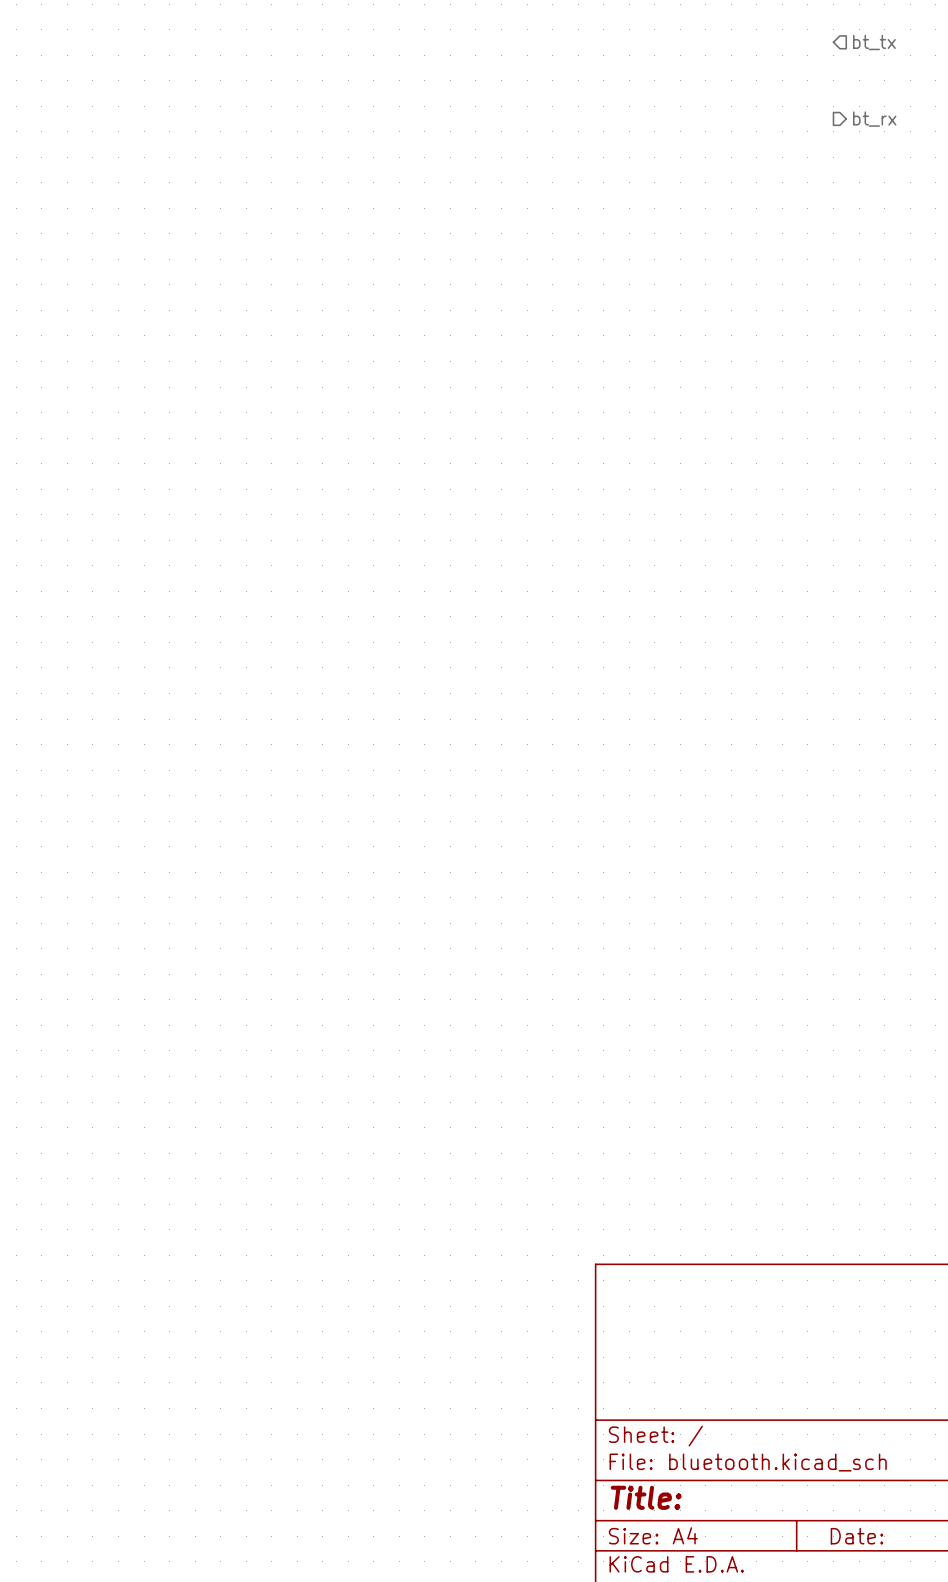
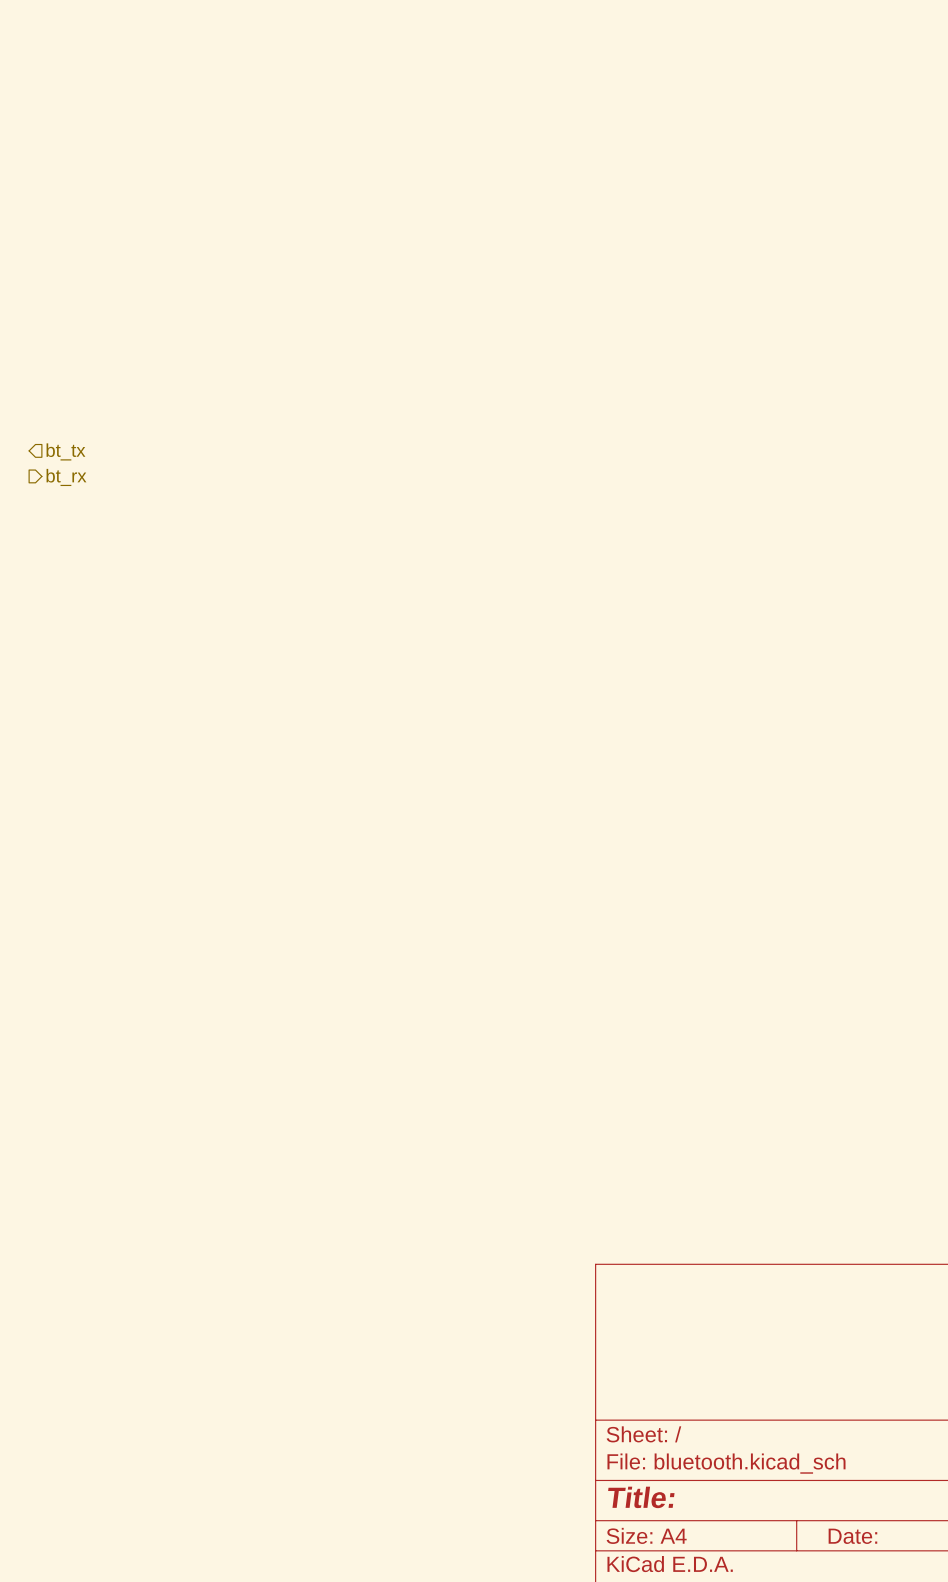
hierarchical label: bt_tx (874, 42) -> none
hierarchical label: bt_rx (874, 119) -> none
hierarchical label: none -> bt_tx (65, 451)
hierarchical label: none -> bt_rx (66, 477)

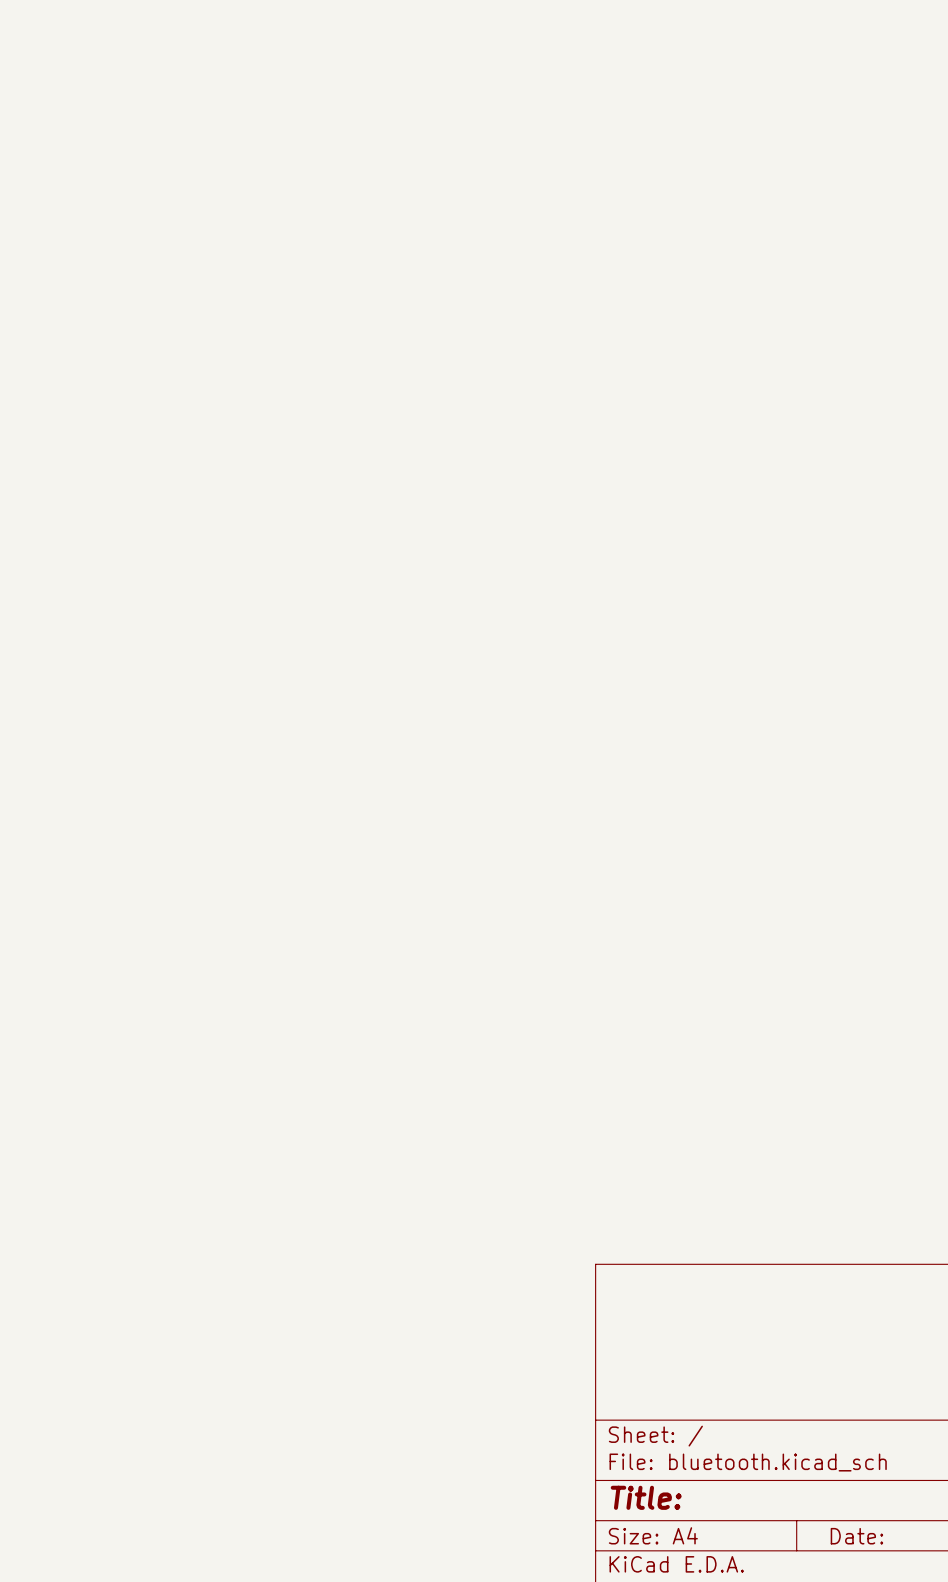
hierarchical label: bt_tx (65, 451) -> none
hierarchical label: bt_rx (66, 477) -> none

